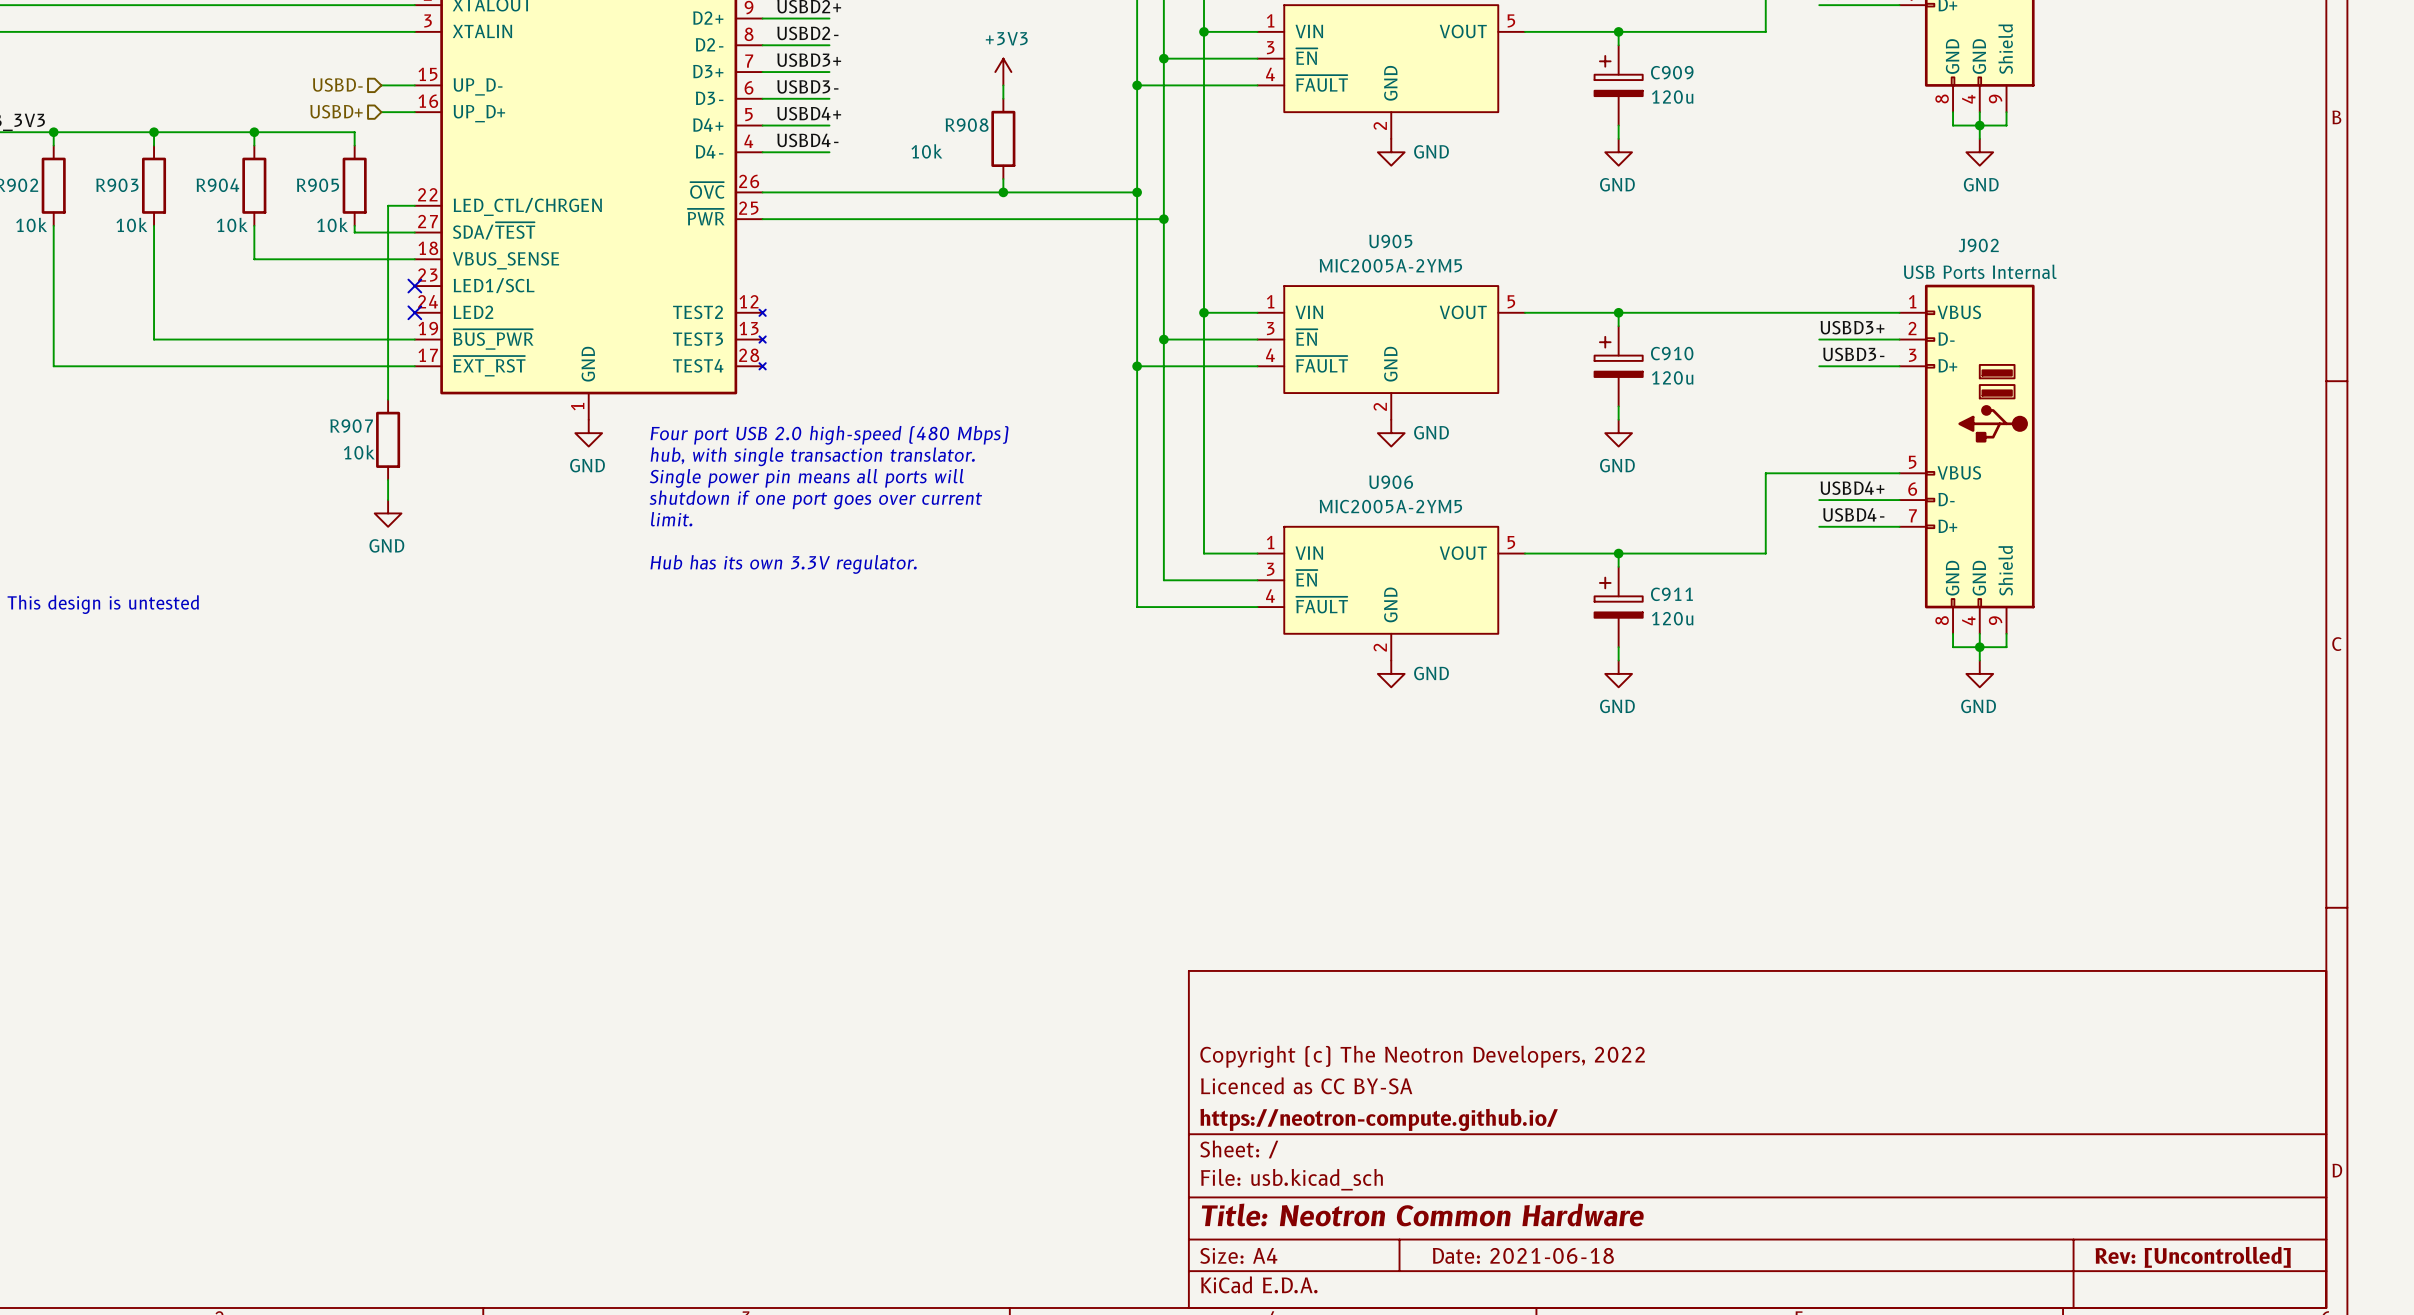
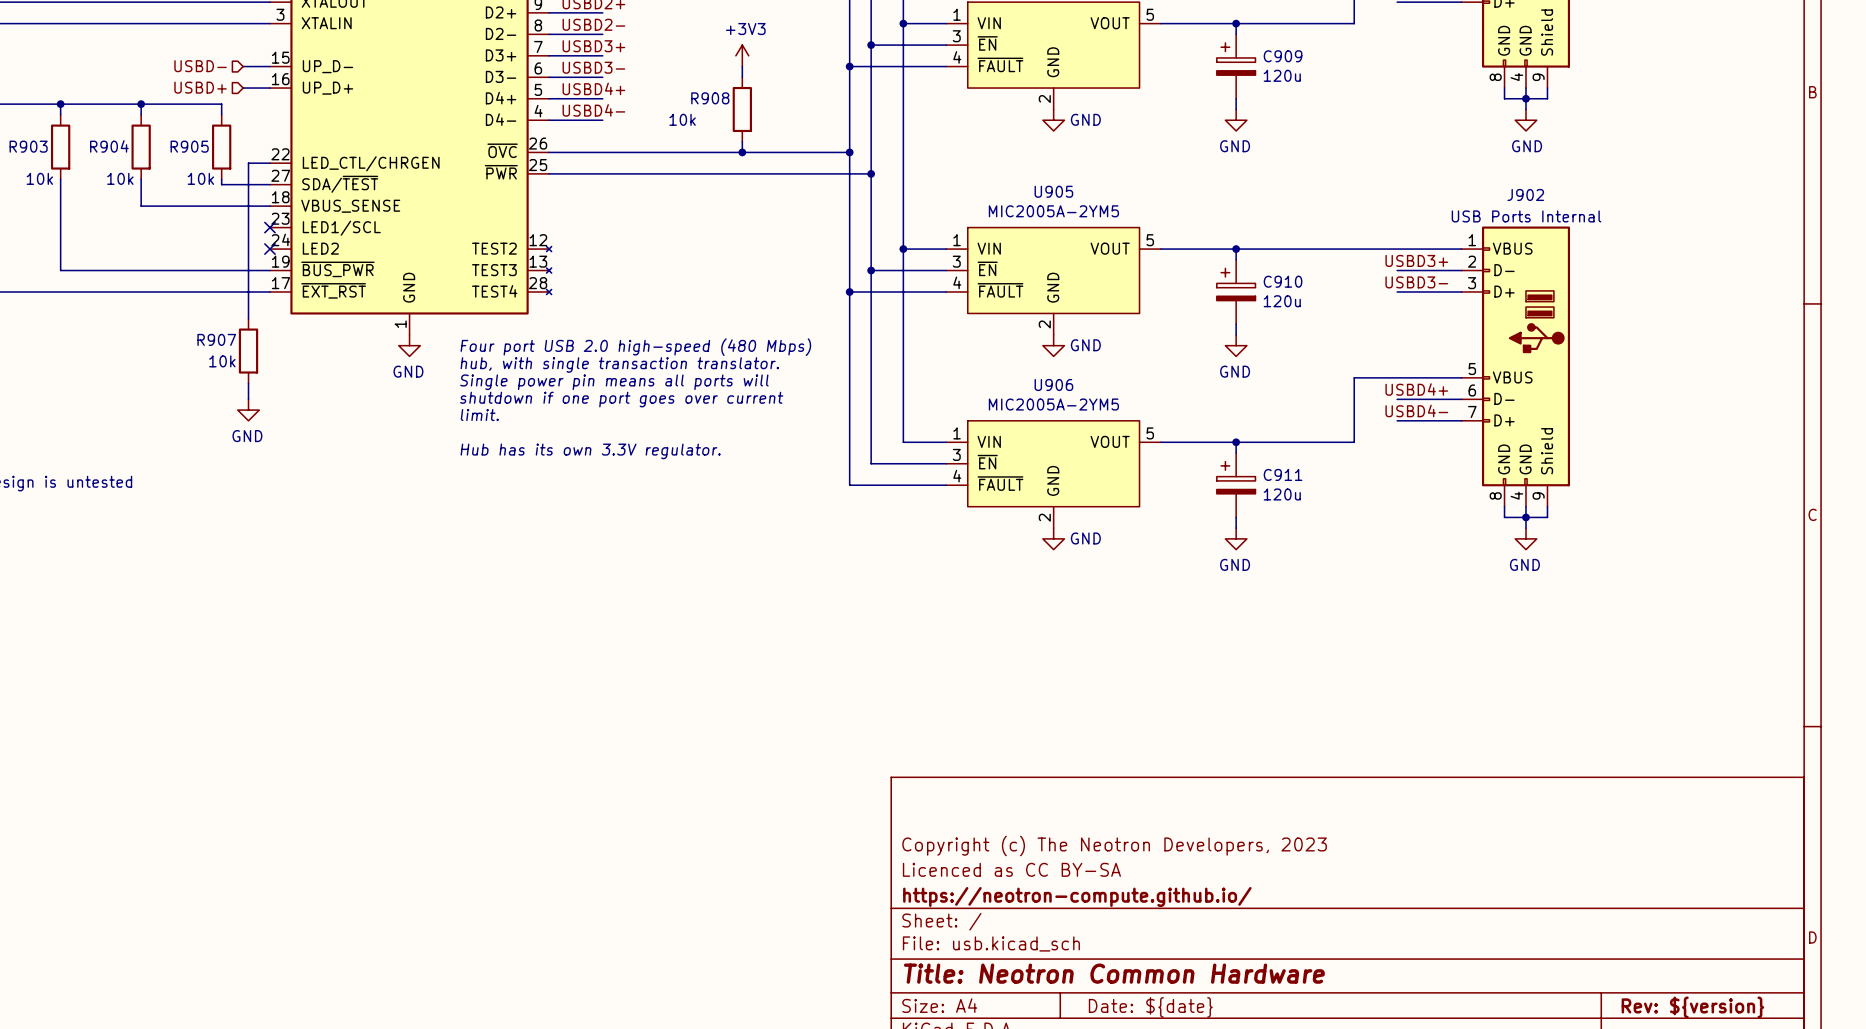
title block: Copyright (c) The Neotron Developers, 2022 (1422, 1056) -> Copyright (c) The Neotron Developers, 2023 (1114, 845)
title block: Date: 2021-06-18 (1523, 1255) -> Date: ${date} (1150, 1007)
title block: Rev: [Uncontrolled] (2193, 1257) -> Rev: ${version} (1692, 1007)

